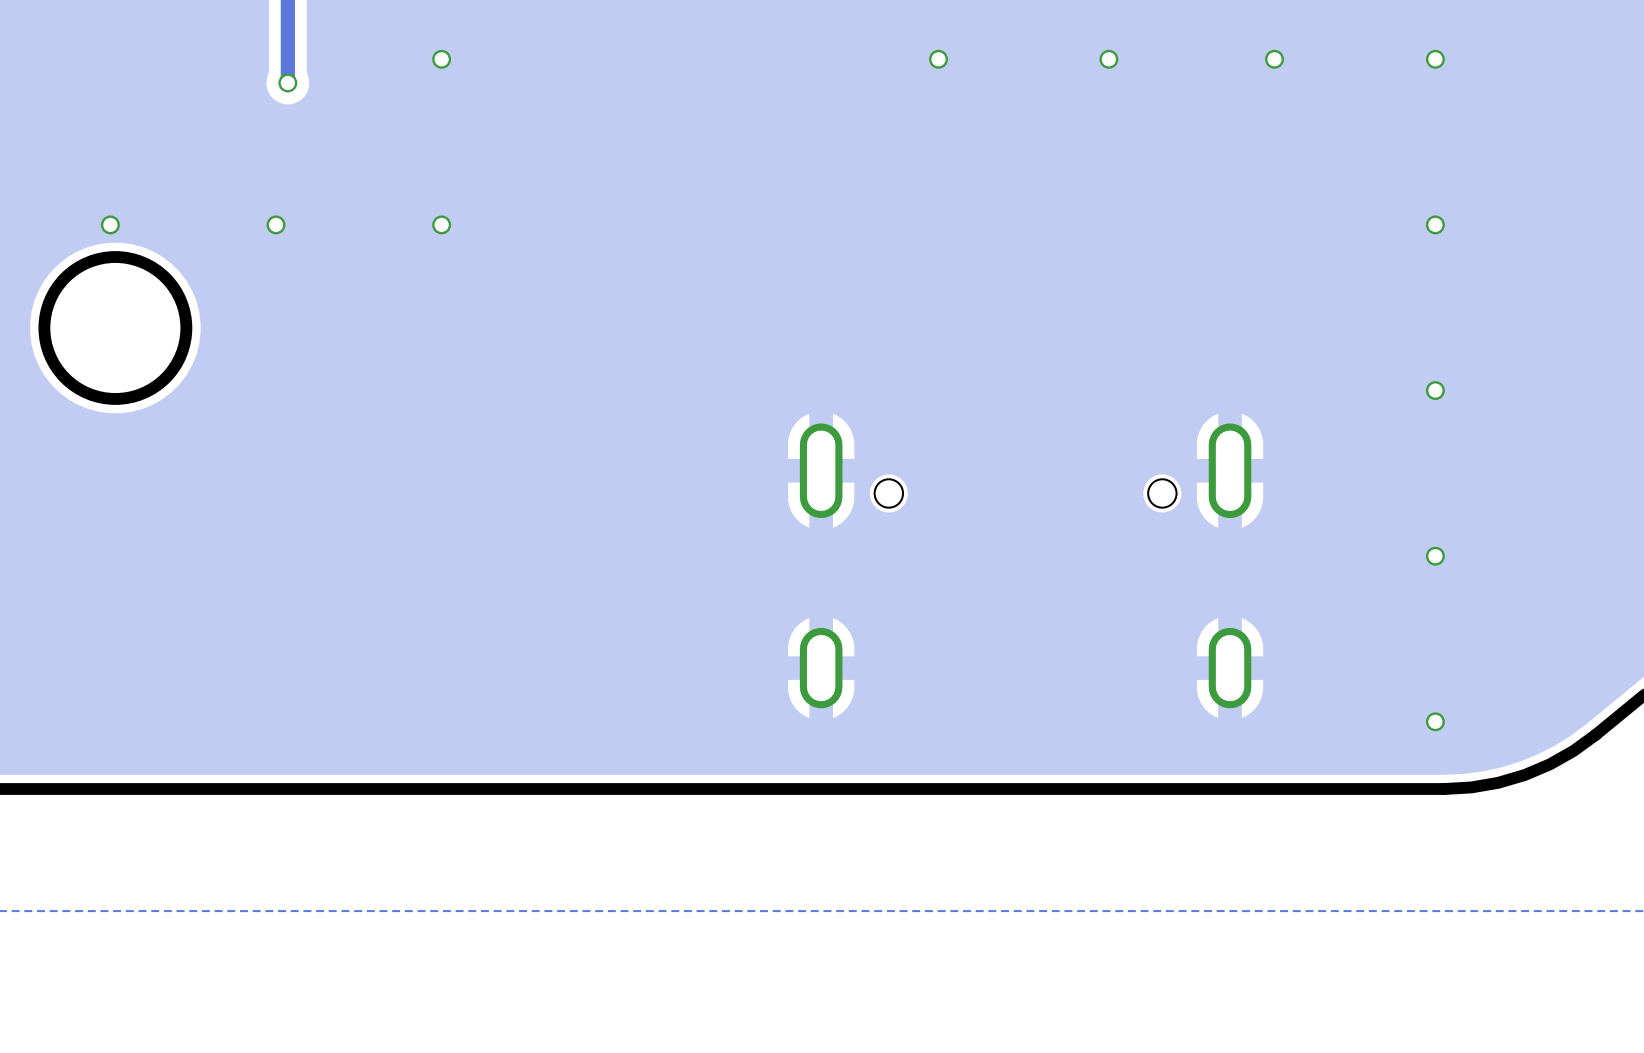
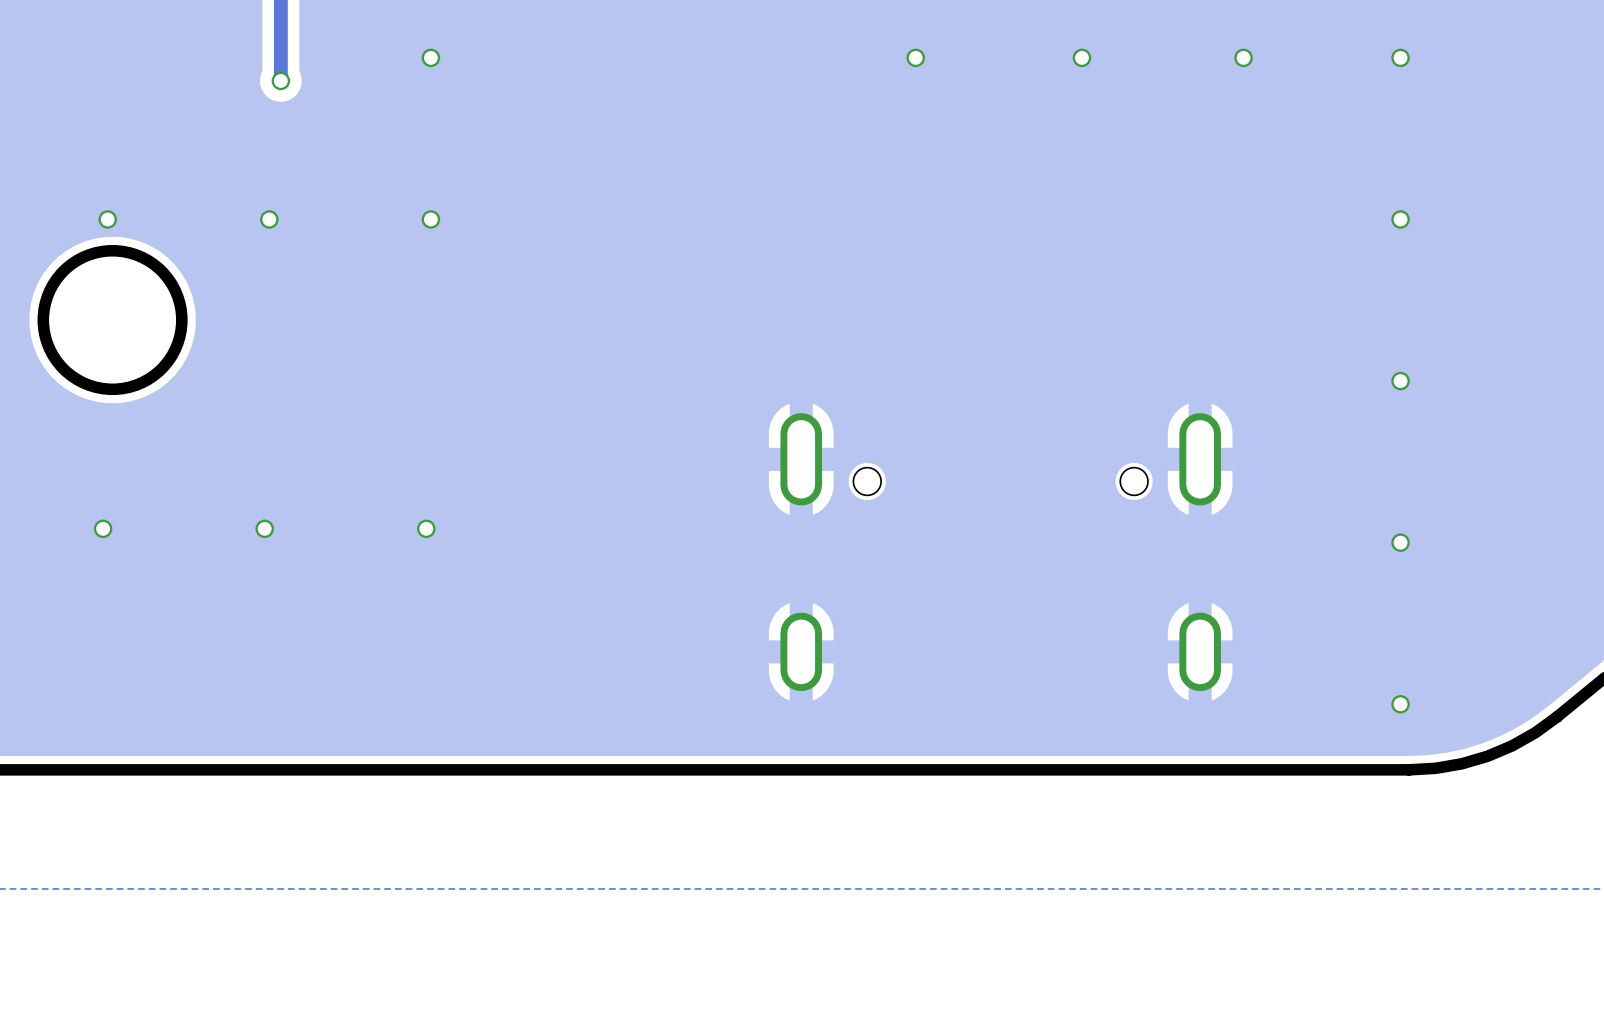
via: none -> (103, 528)
via: none -> (264, 528)
via: none -> (426, 528)

